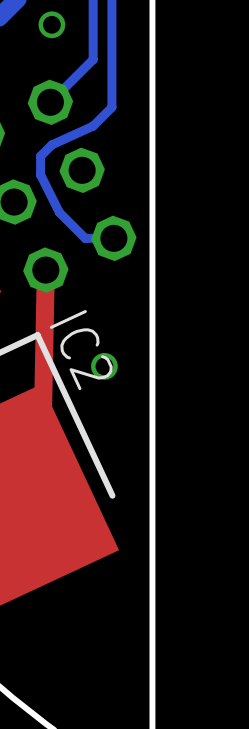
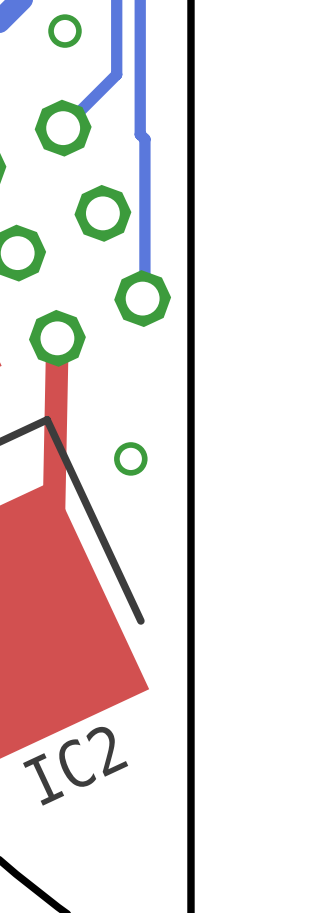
bottom track: (111, 107) (93, 126) (51, 144) (40, 156) (40, 174) (59, 212) (85, 238) (113, 238) -> (140, 134) (144, 139) (144, 275) (142, 277) (142, 298)
IC2 name rotation: 0° (81, 350) -> 90° counterclockwise (75, 765)
IC2 name position: IC2 (81, 350) -> IC2 (75, 765)

